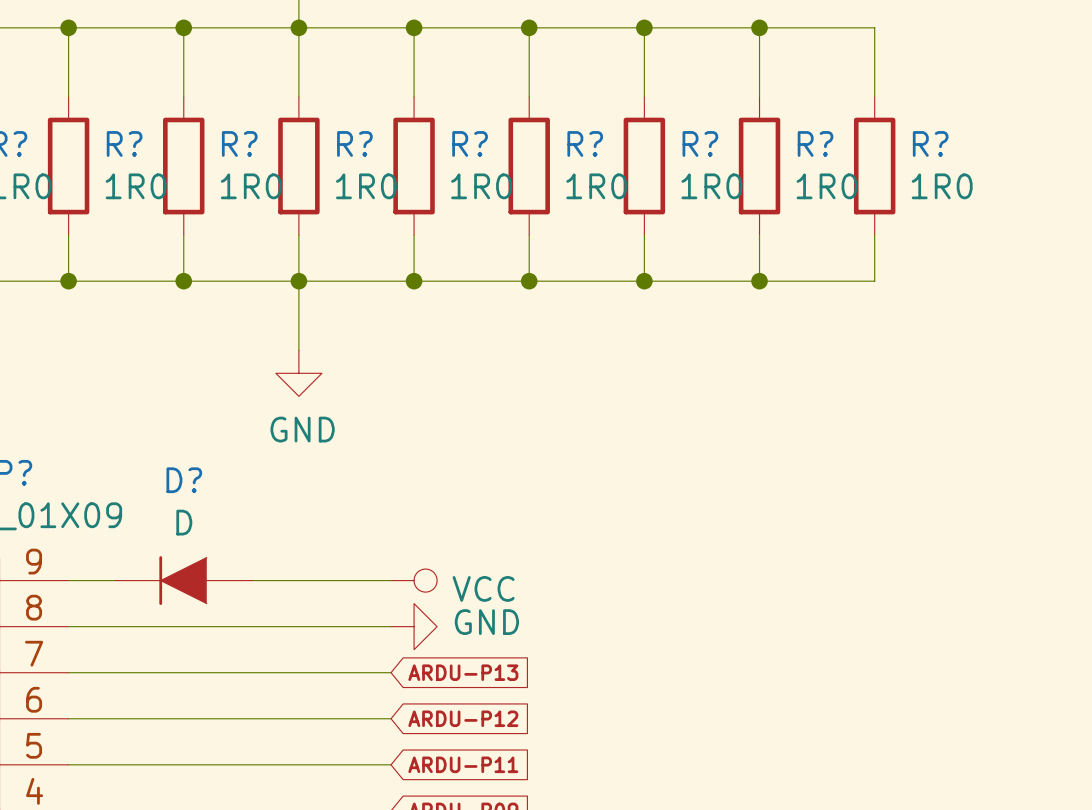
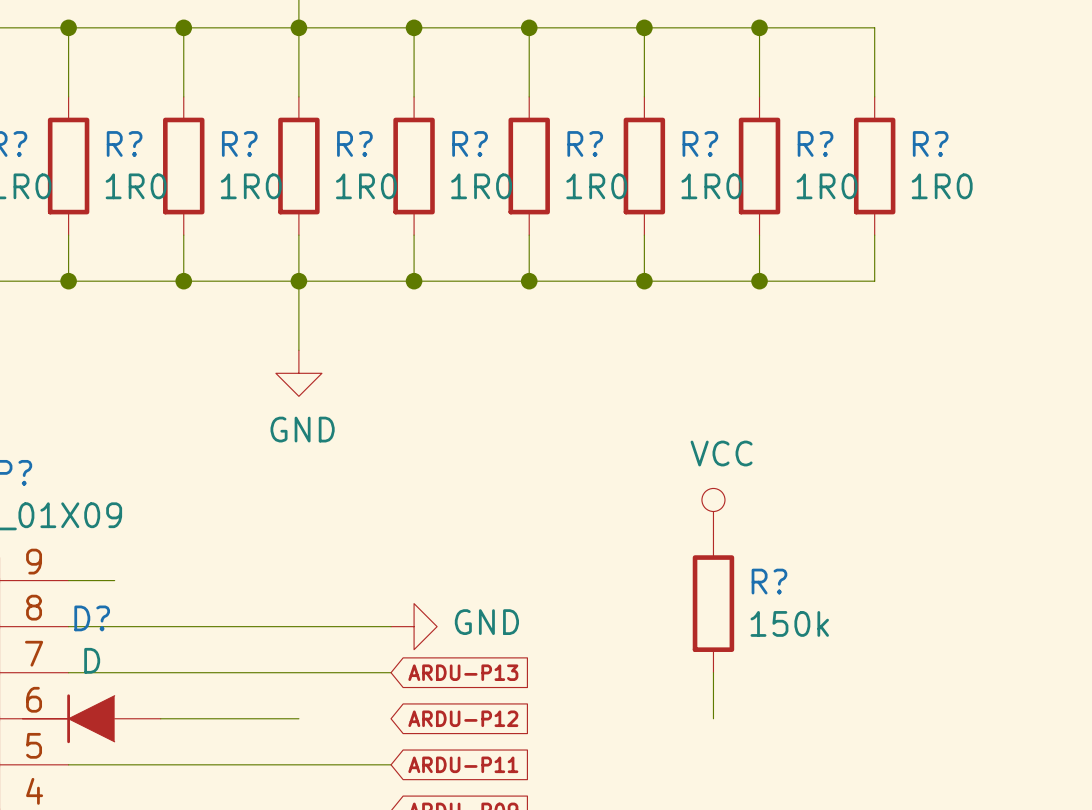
D? position: (183, 580) -> (91, 718)
wire: (252, 580) (391, 580) -> none
power symbol rotation: 0° (414, 580) -> 90° counterclockwise (713, 511)
power symbol position: VCC (414, 580) -> VCC (713, 511)
R?: none -> 150k (713, 603)
wire: none -> (713, 672) (713, 718)
wire: (298, 718) (391, 718) -> none

